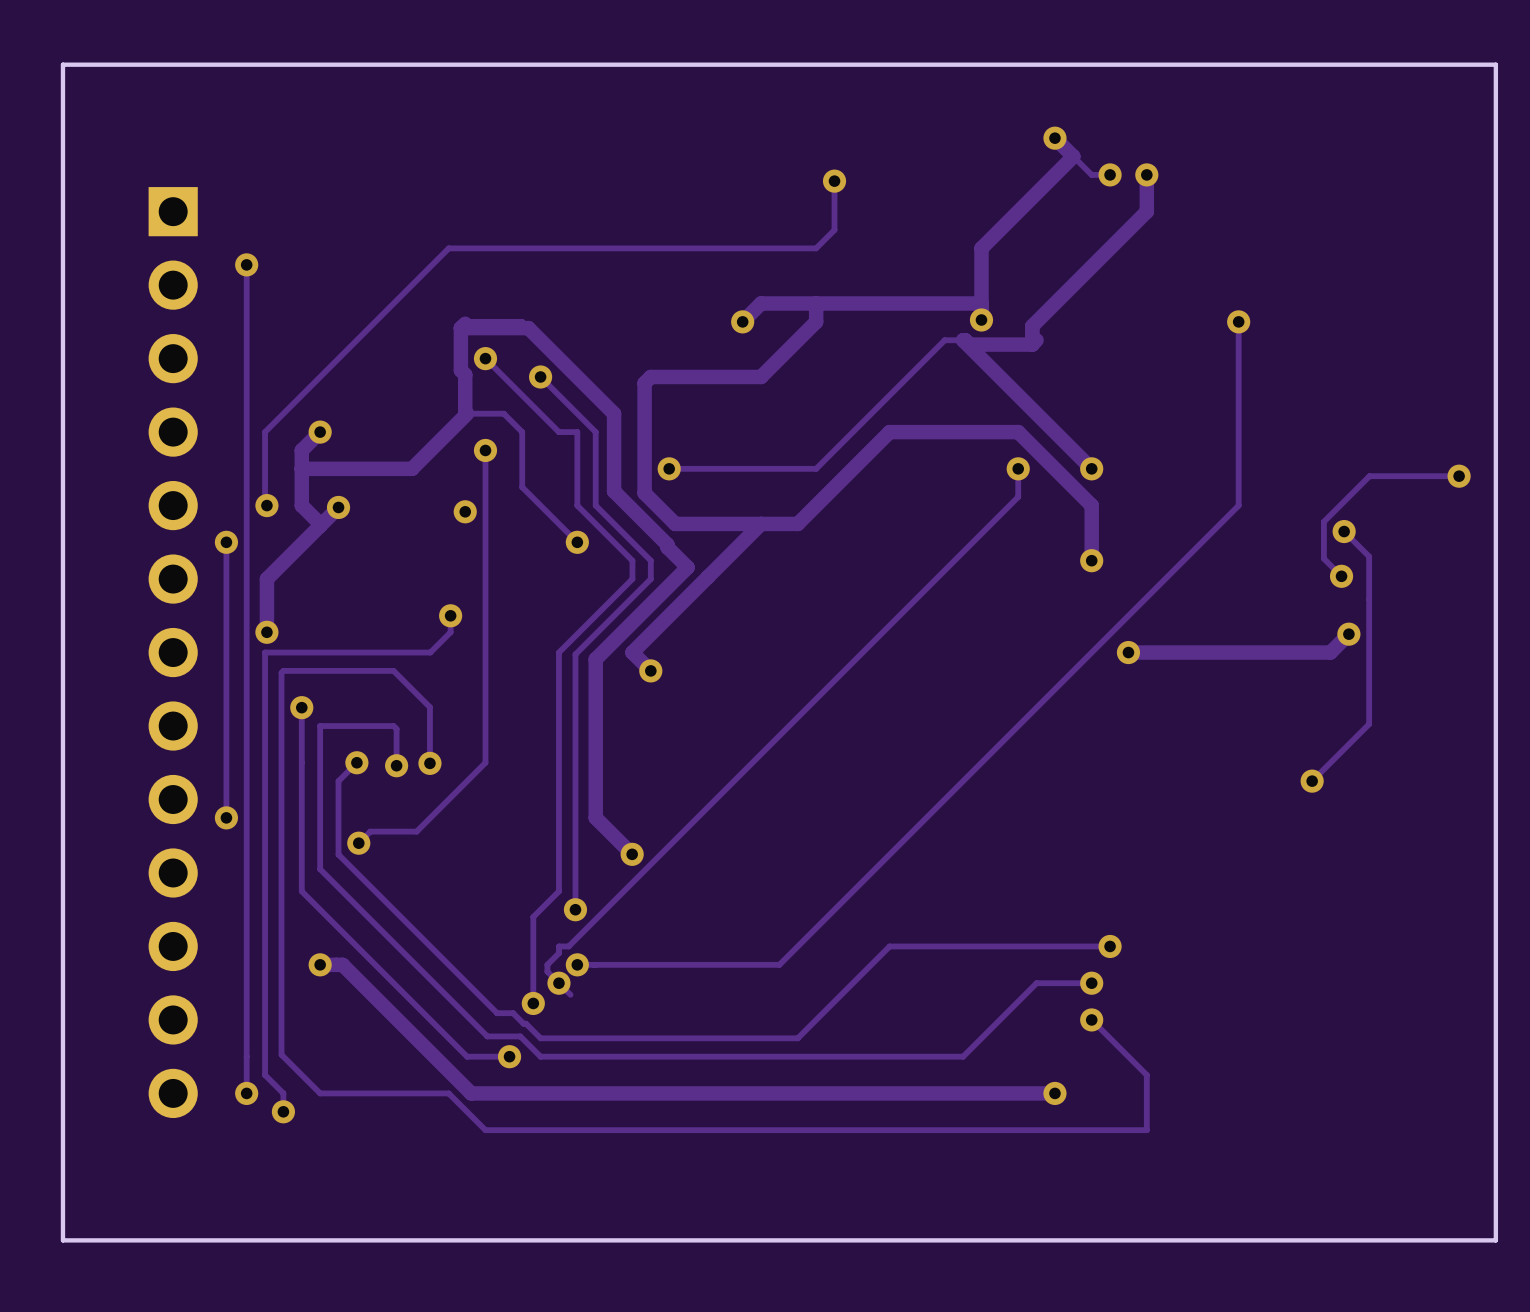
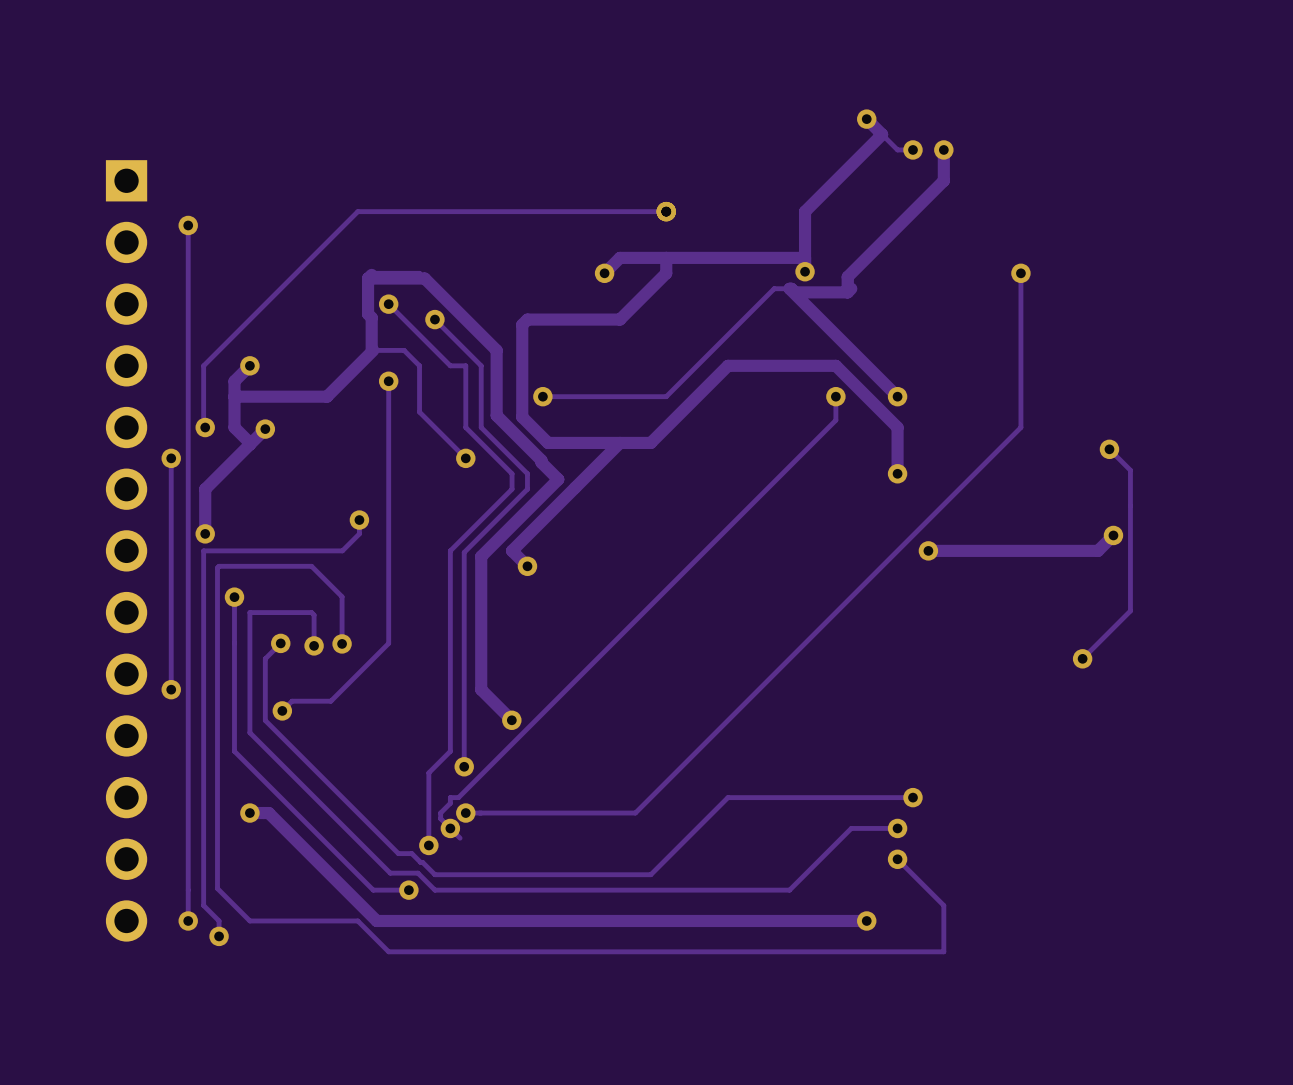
board edge: (1495, 64) (62, 64) (62, 1240) (1495, 1240) (1495, 64) -> none
track: (834, 181) (834, 230) (816, 248) -> none
via position: (834, 181) -> (666, 211)
track: (1459, 476) (1369, 476) (1323, 521) (1323, 558) (1341, 576) -> none
via: (1459, 476) -> none
via: (465, 511) -> none
via: (1341, 576) -> none

